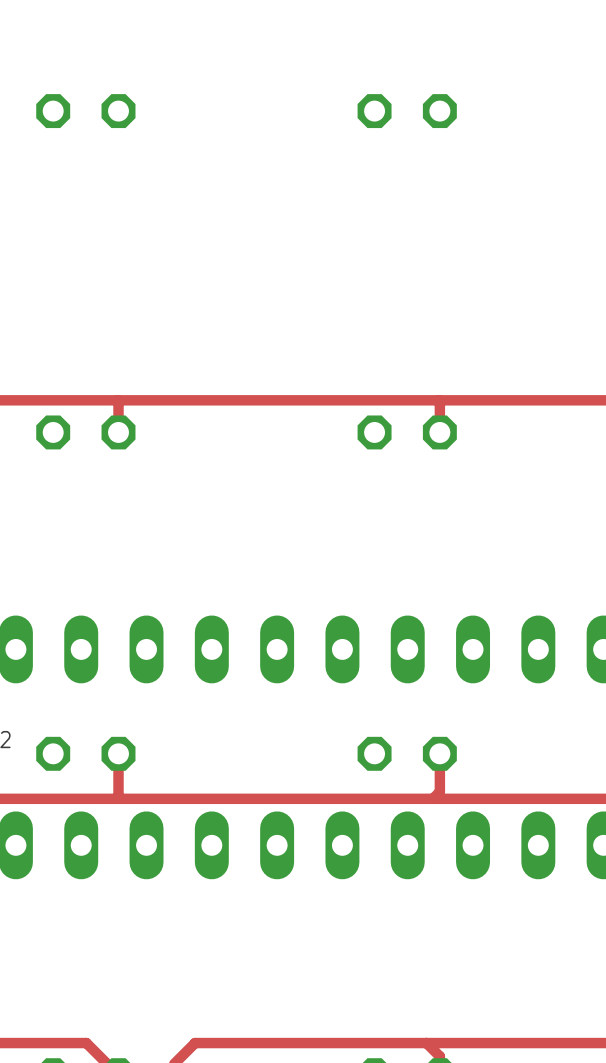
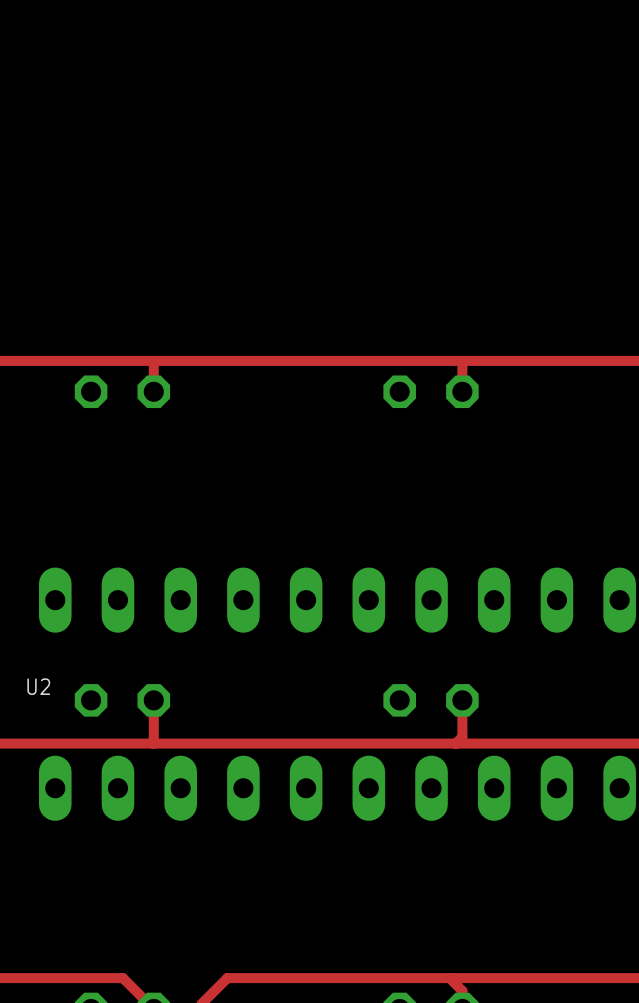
part: (85, 111) -> none
part: (407, 111) -> none

